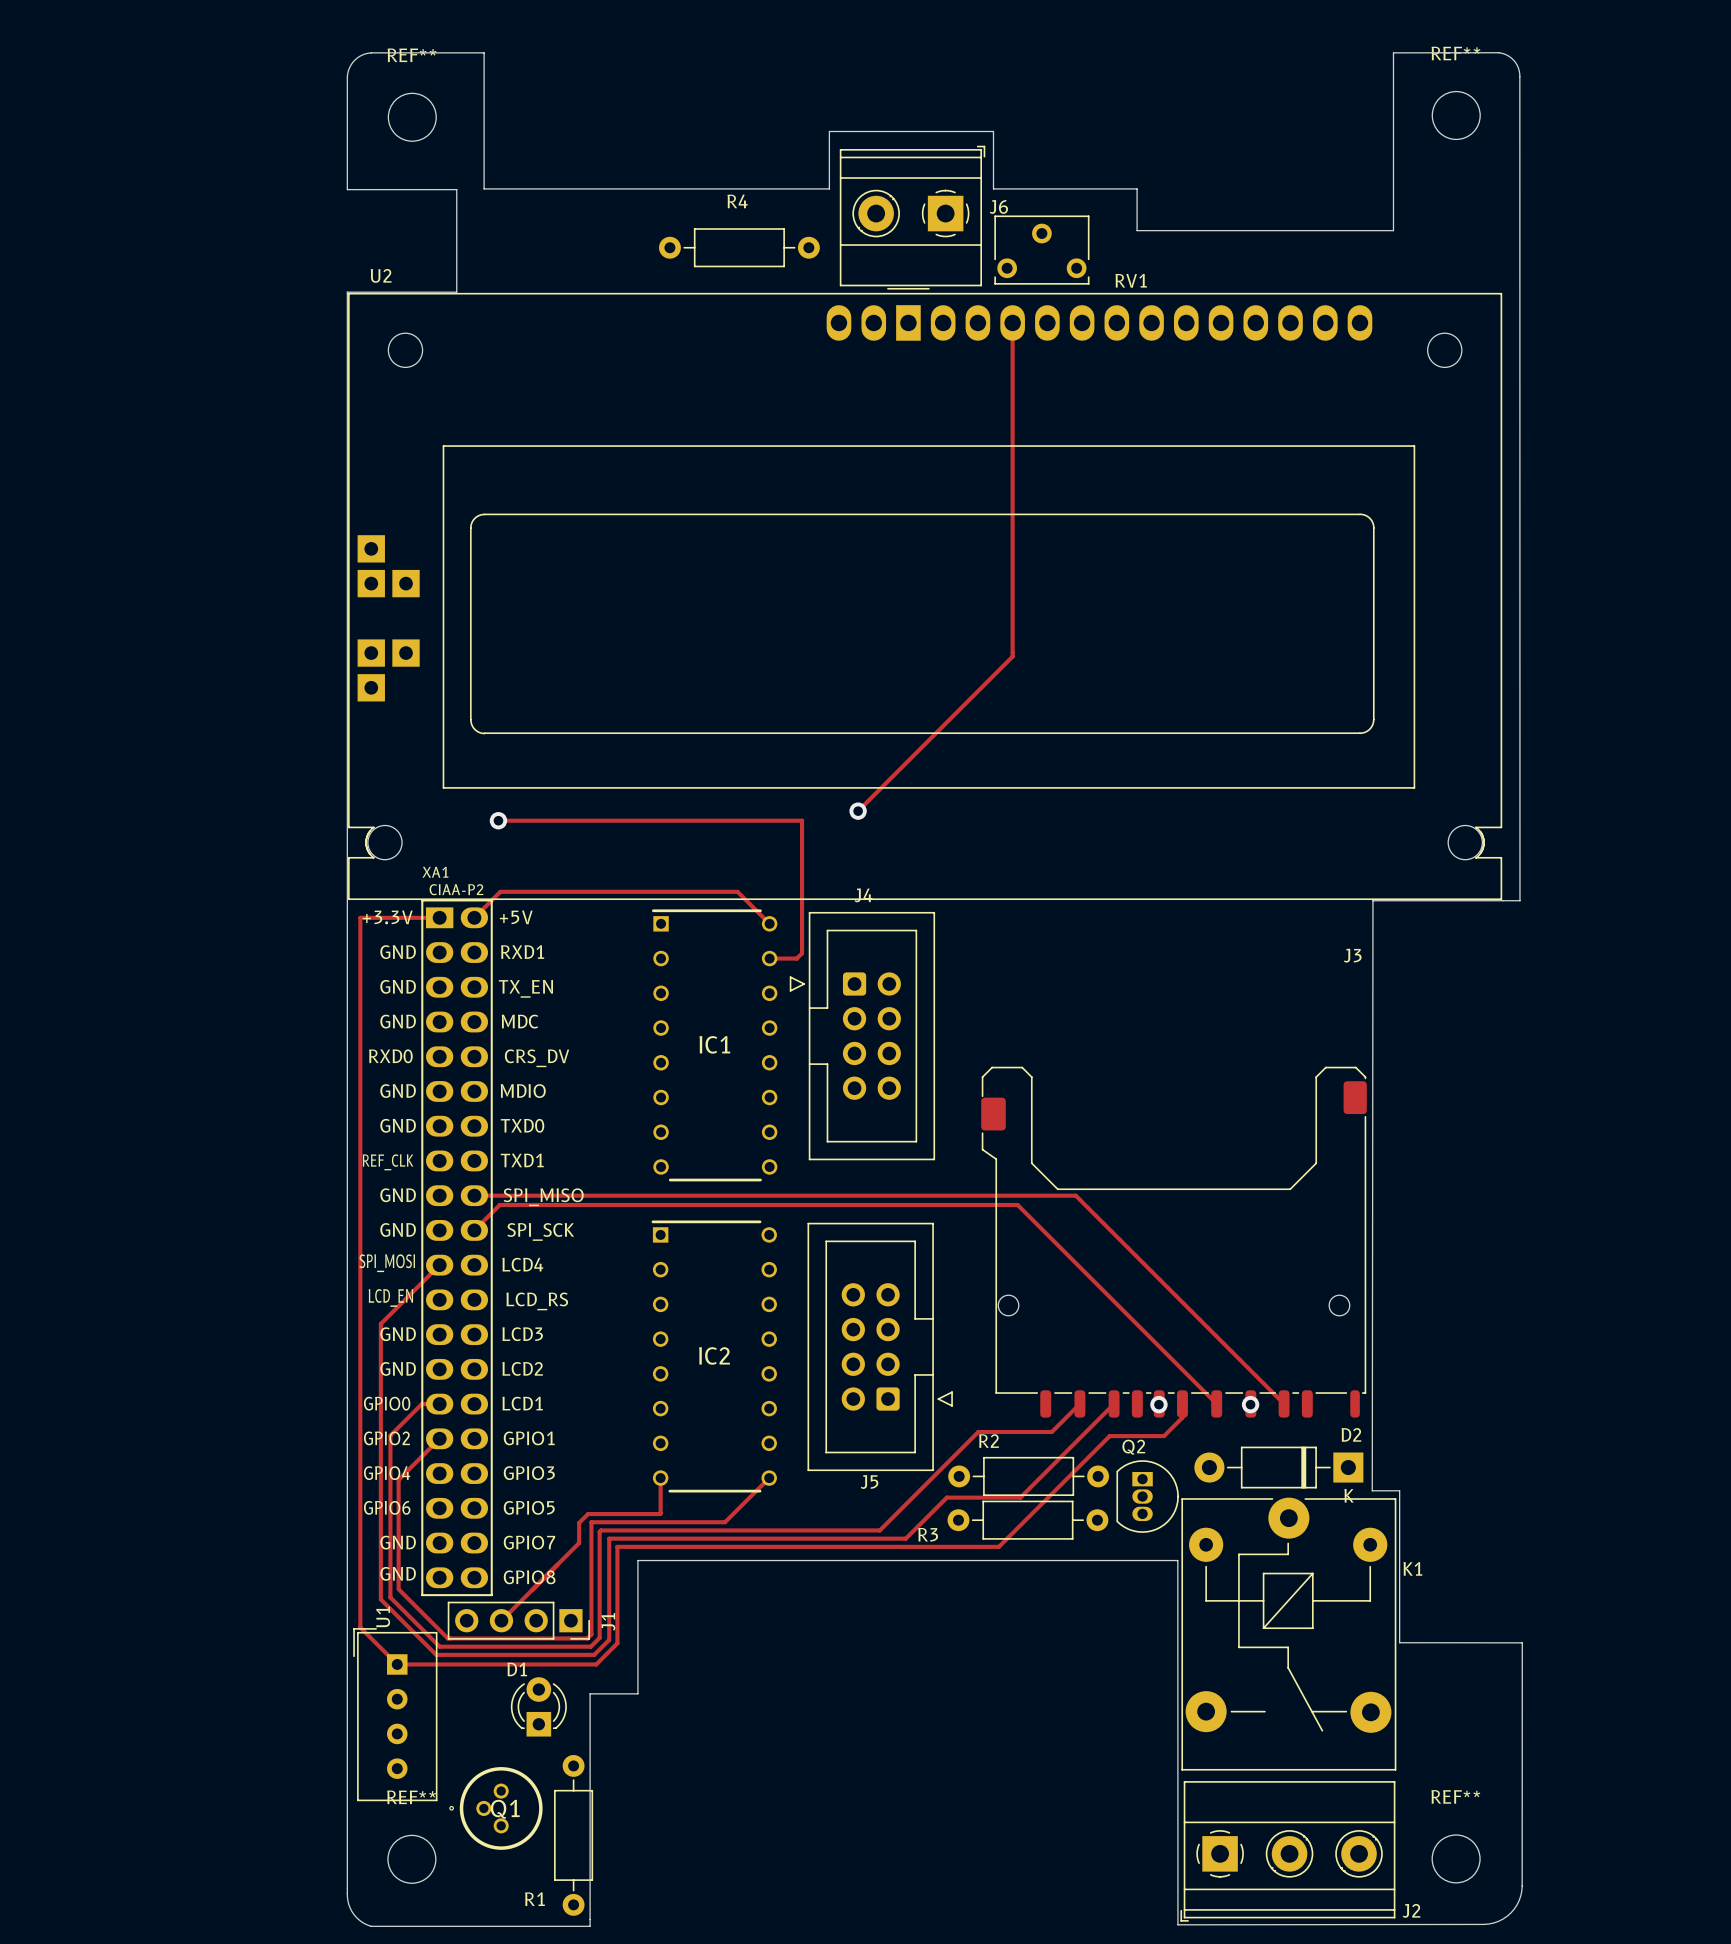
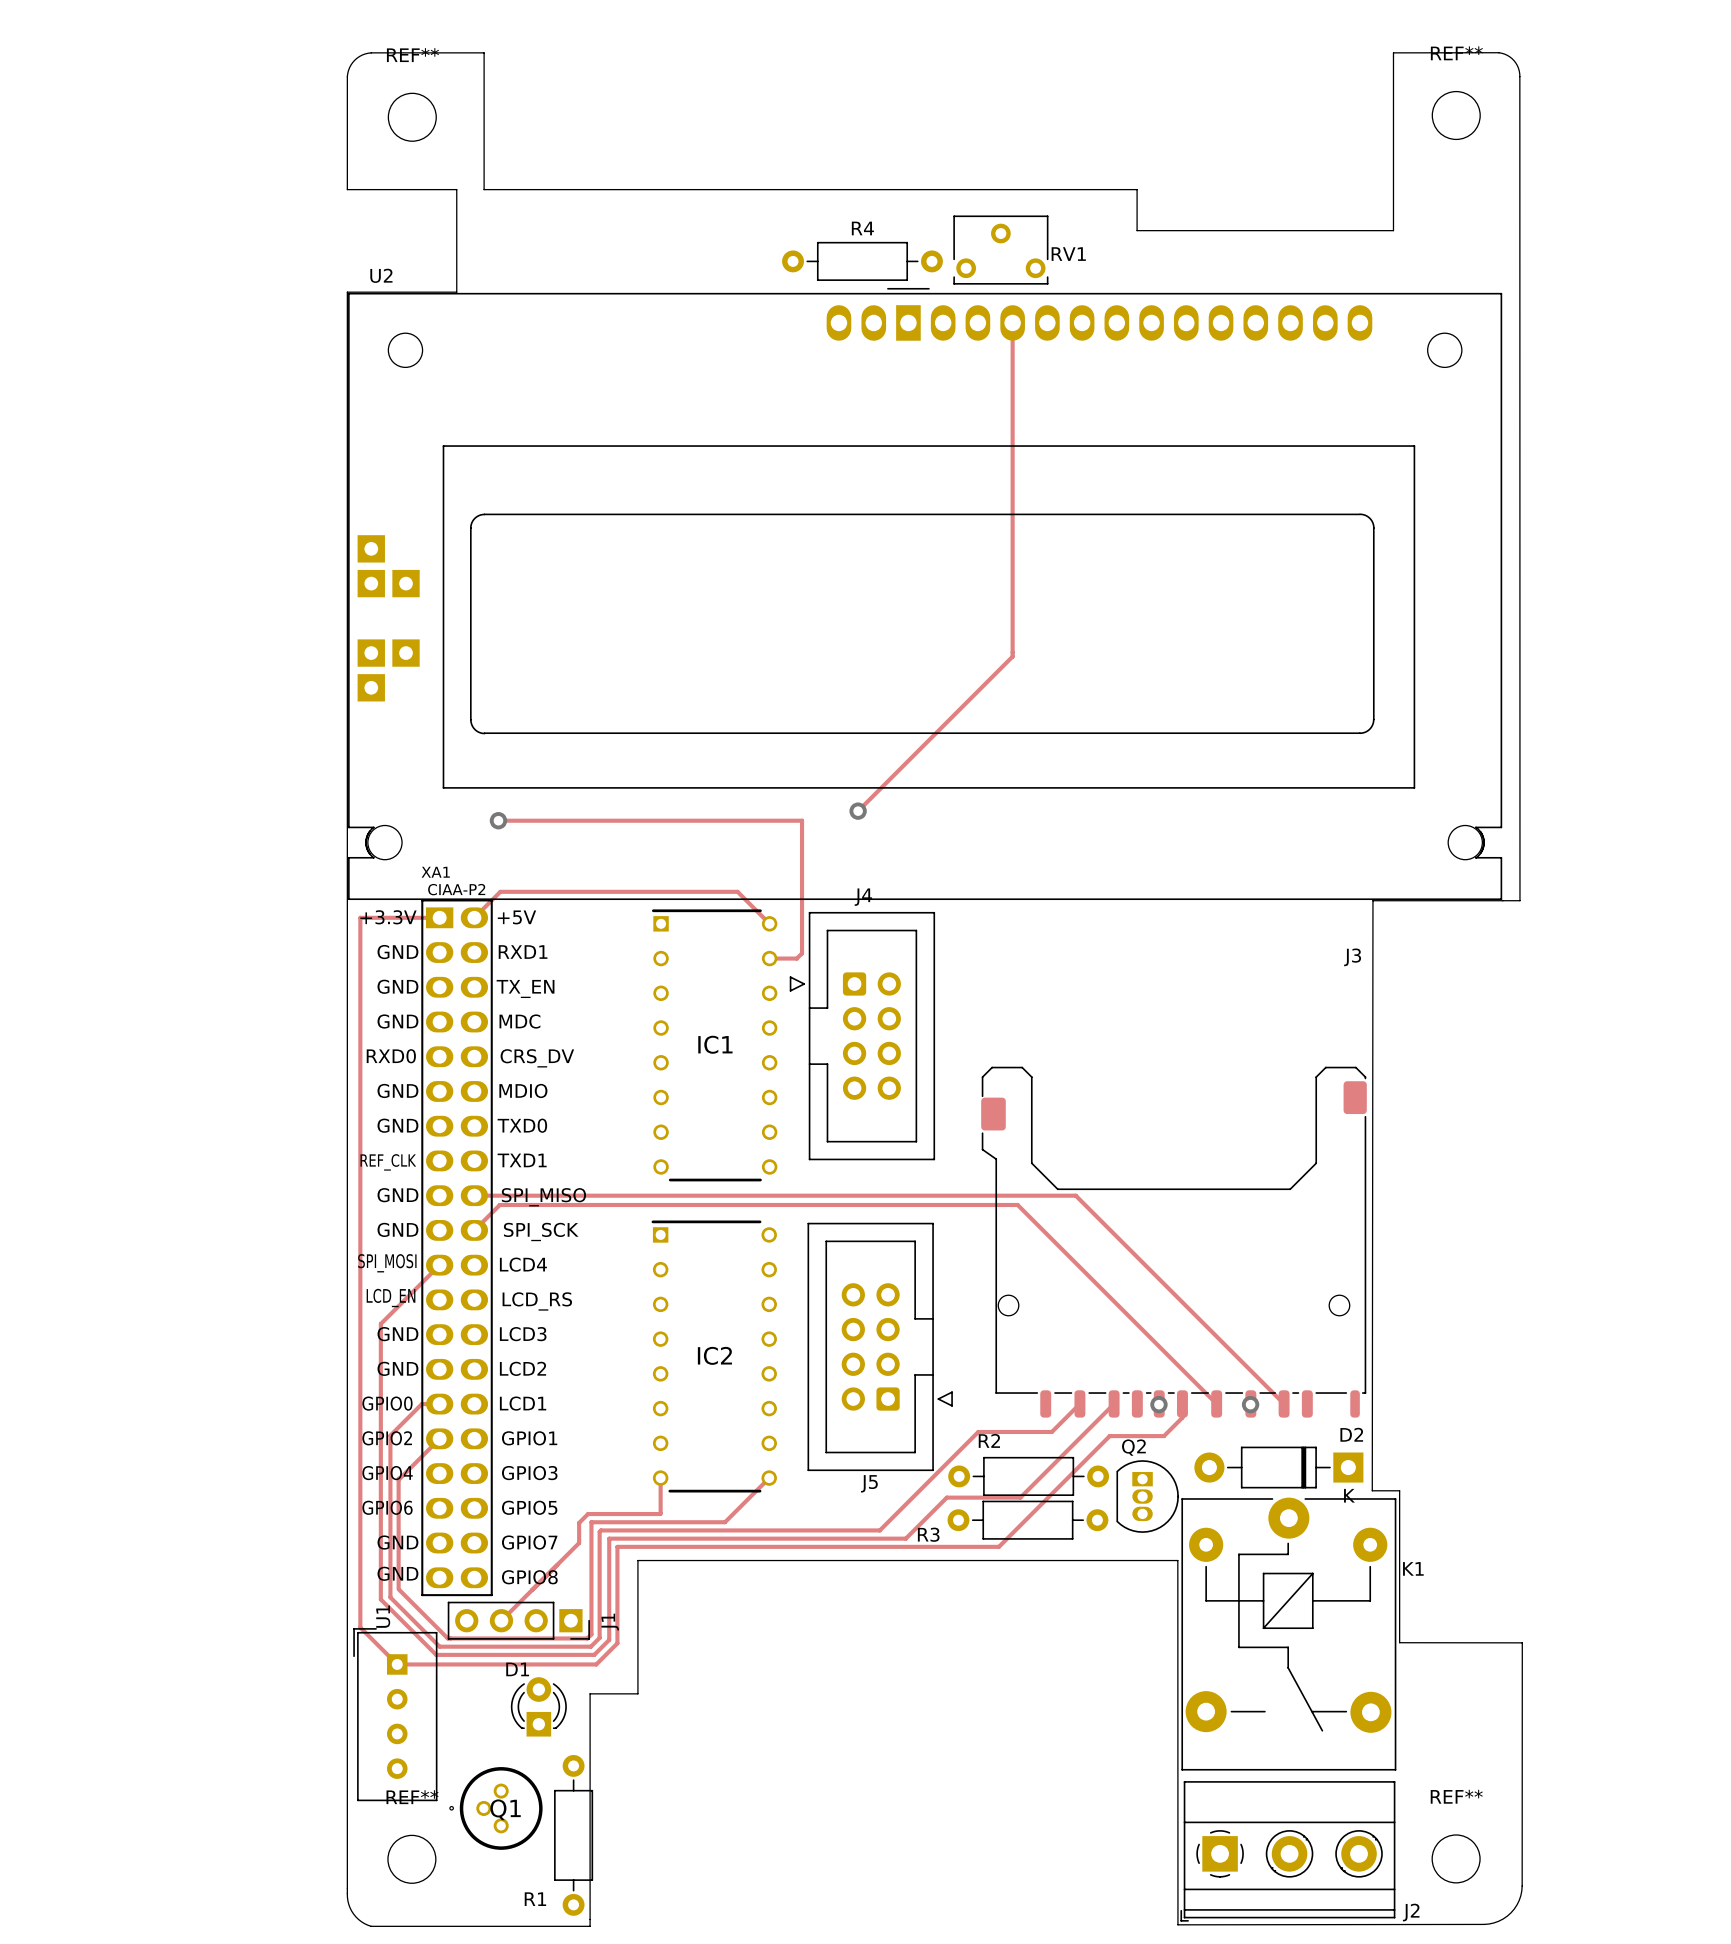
board edge: (484, 188) (829, 188) (829, 131) (993, 131) (993, 188) (1137, 189) -> (484, 188) (1137, 189)
R4 name position: R4 (737, 201) -> R4 (862, 228)
J6: (912, 216) -> none
R4 position: (739, 247) -> (862, 261)
RV1 position: (1041, 250) -> (1000, 250)
RV1 name position: RV1 (1131, 280) -> RV1 (1068, 254)

